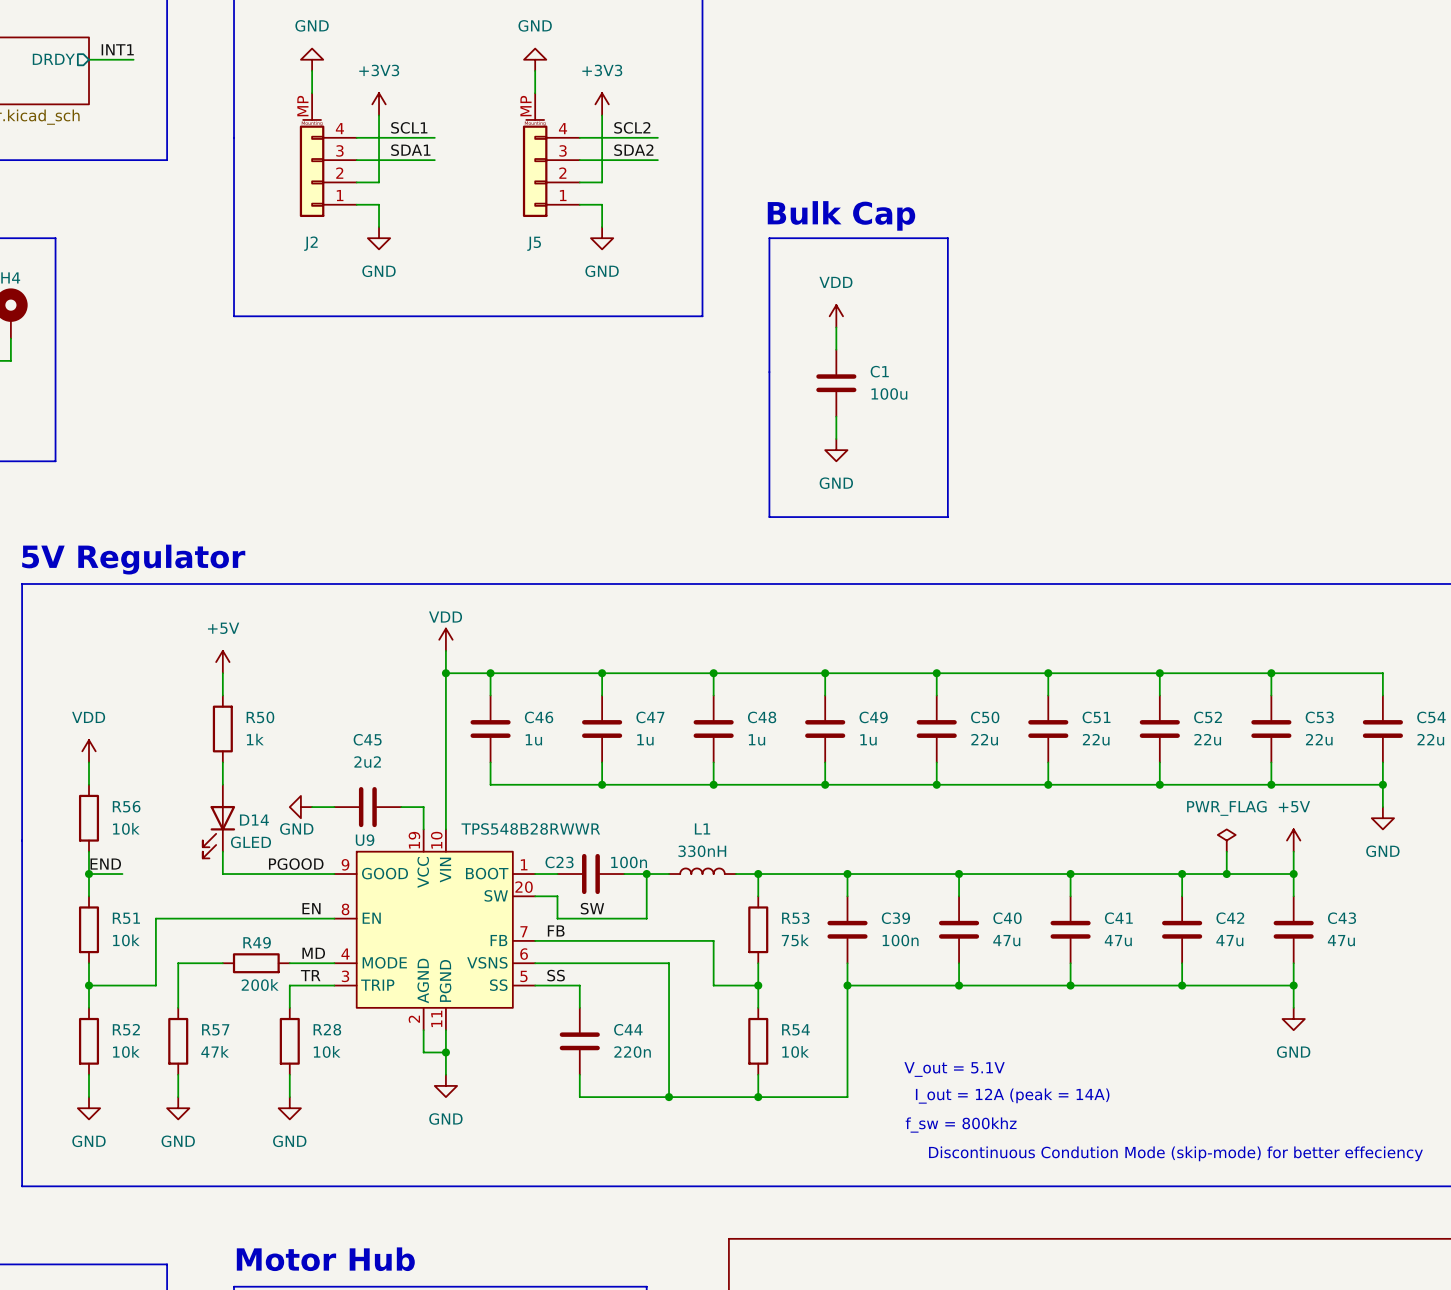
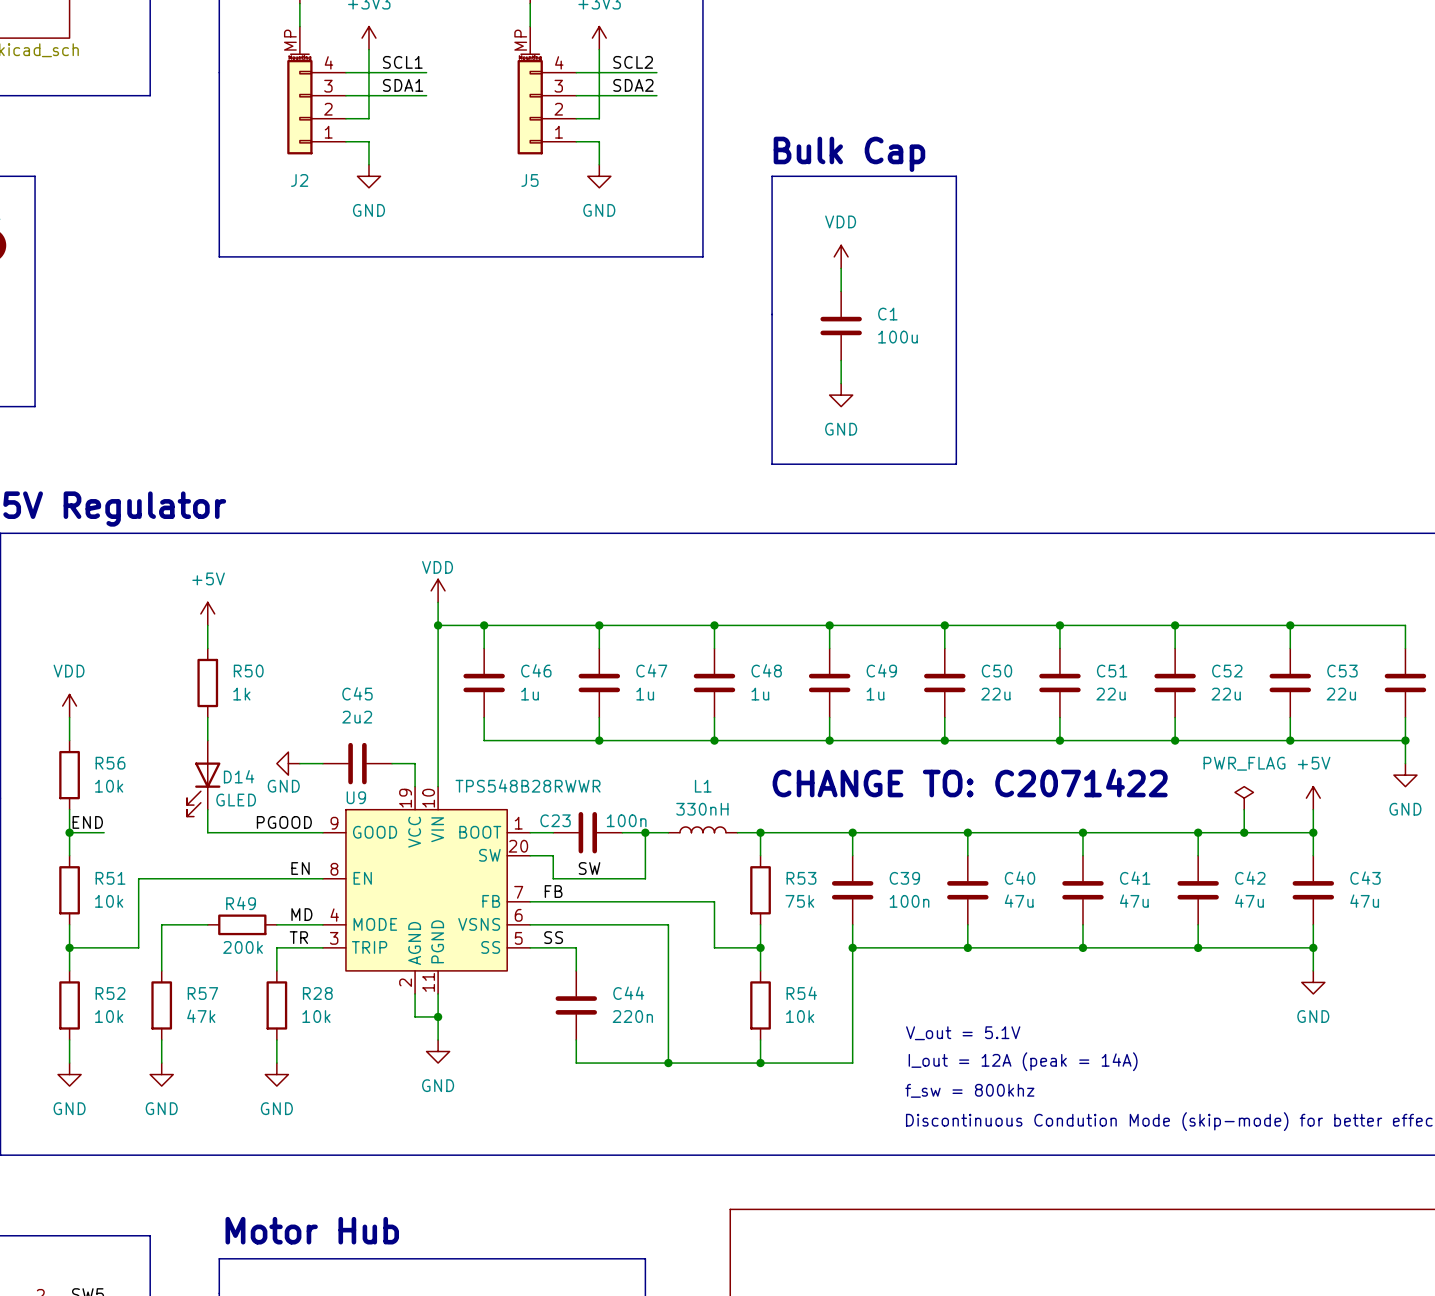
text: none -> CHANGE TO: C2071422 (970, 782)

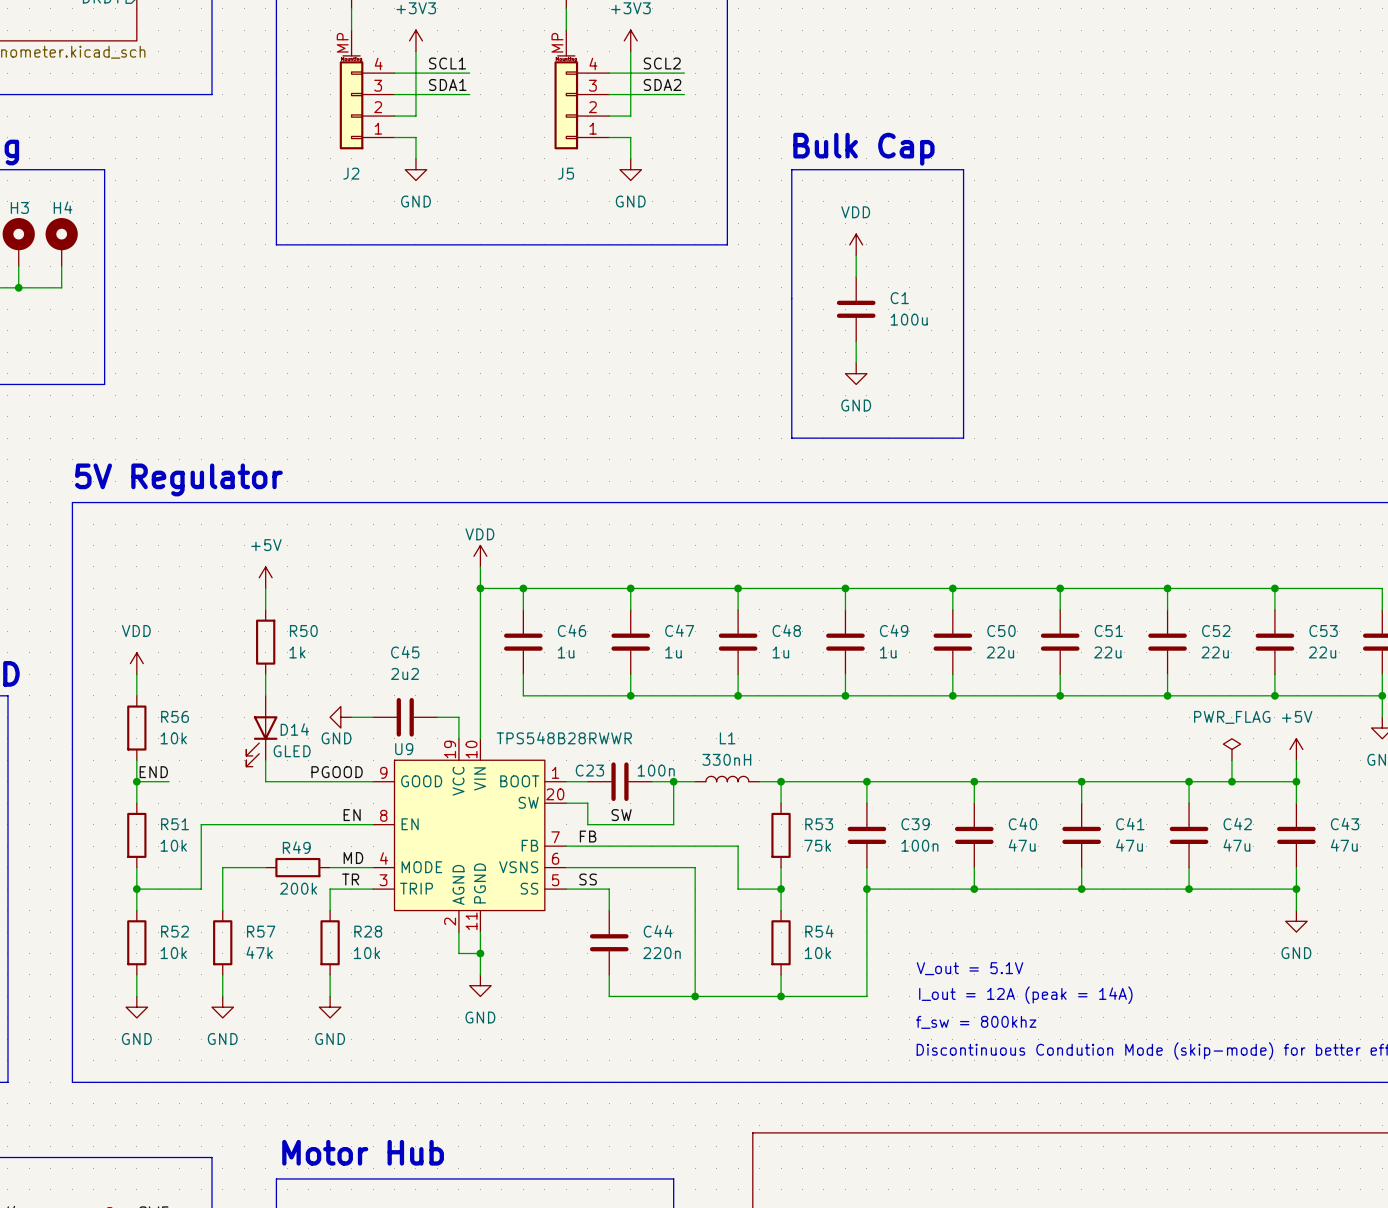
text: CHANGE TO: C2071422 (970, 782) -> none

